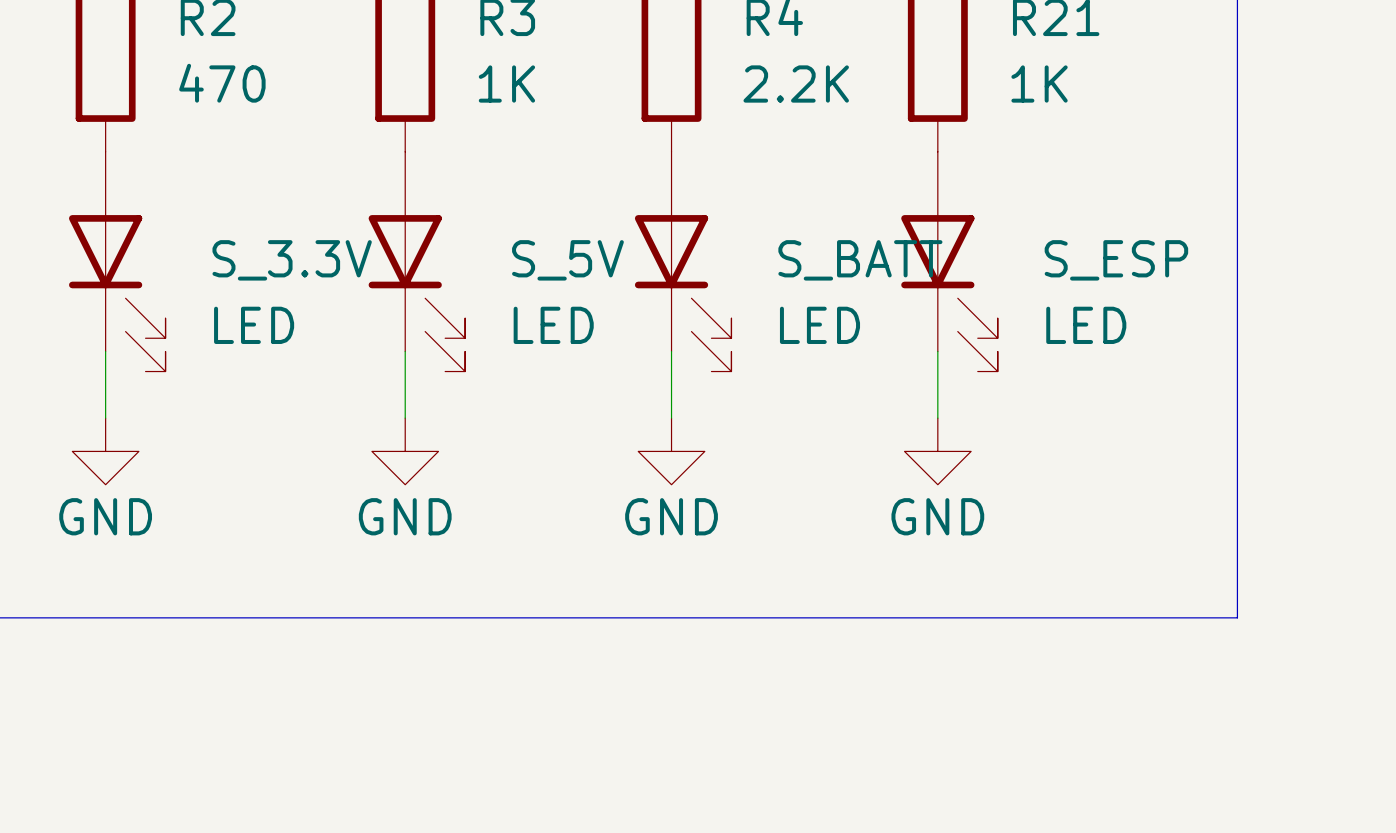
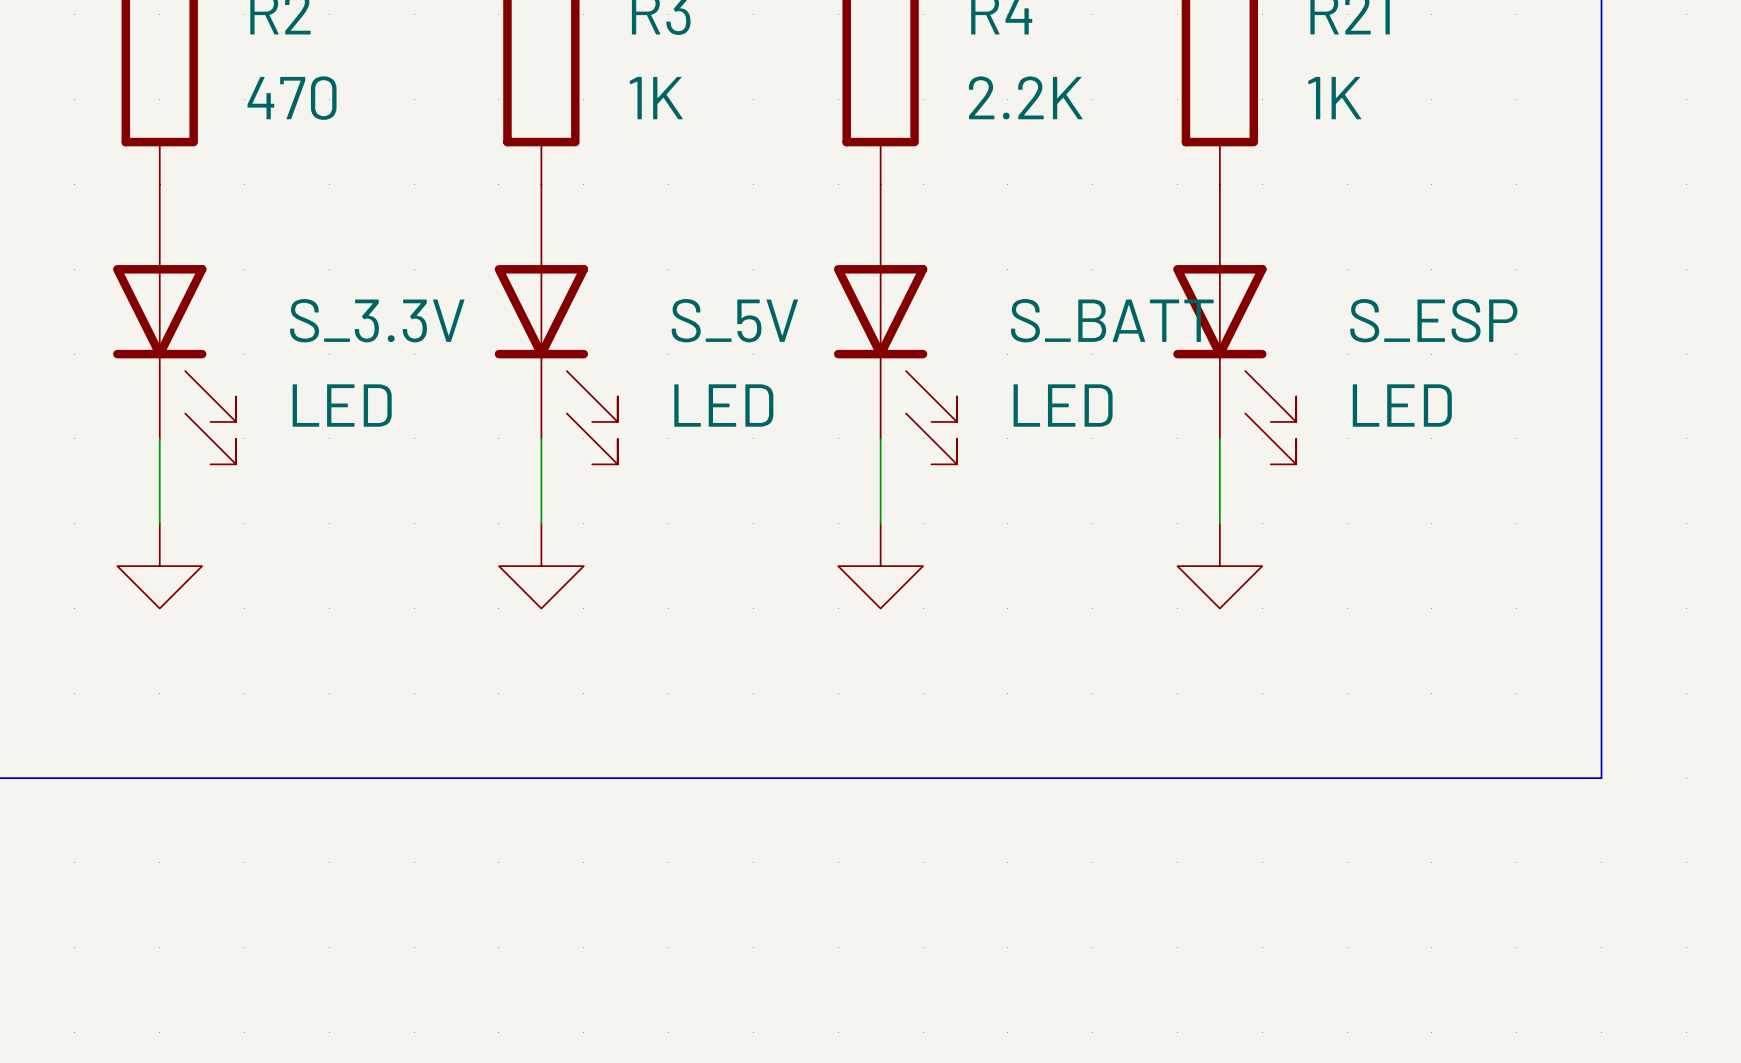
power symbol text: GND (105, 516) -> none
power symbol text: GND (405, 516) -> none
power symbol text: GND (671, 516) -> none
power symbol text: GND (937, 516) -> none

